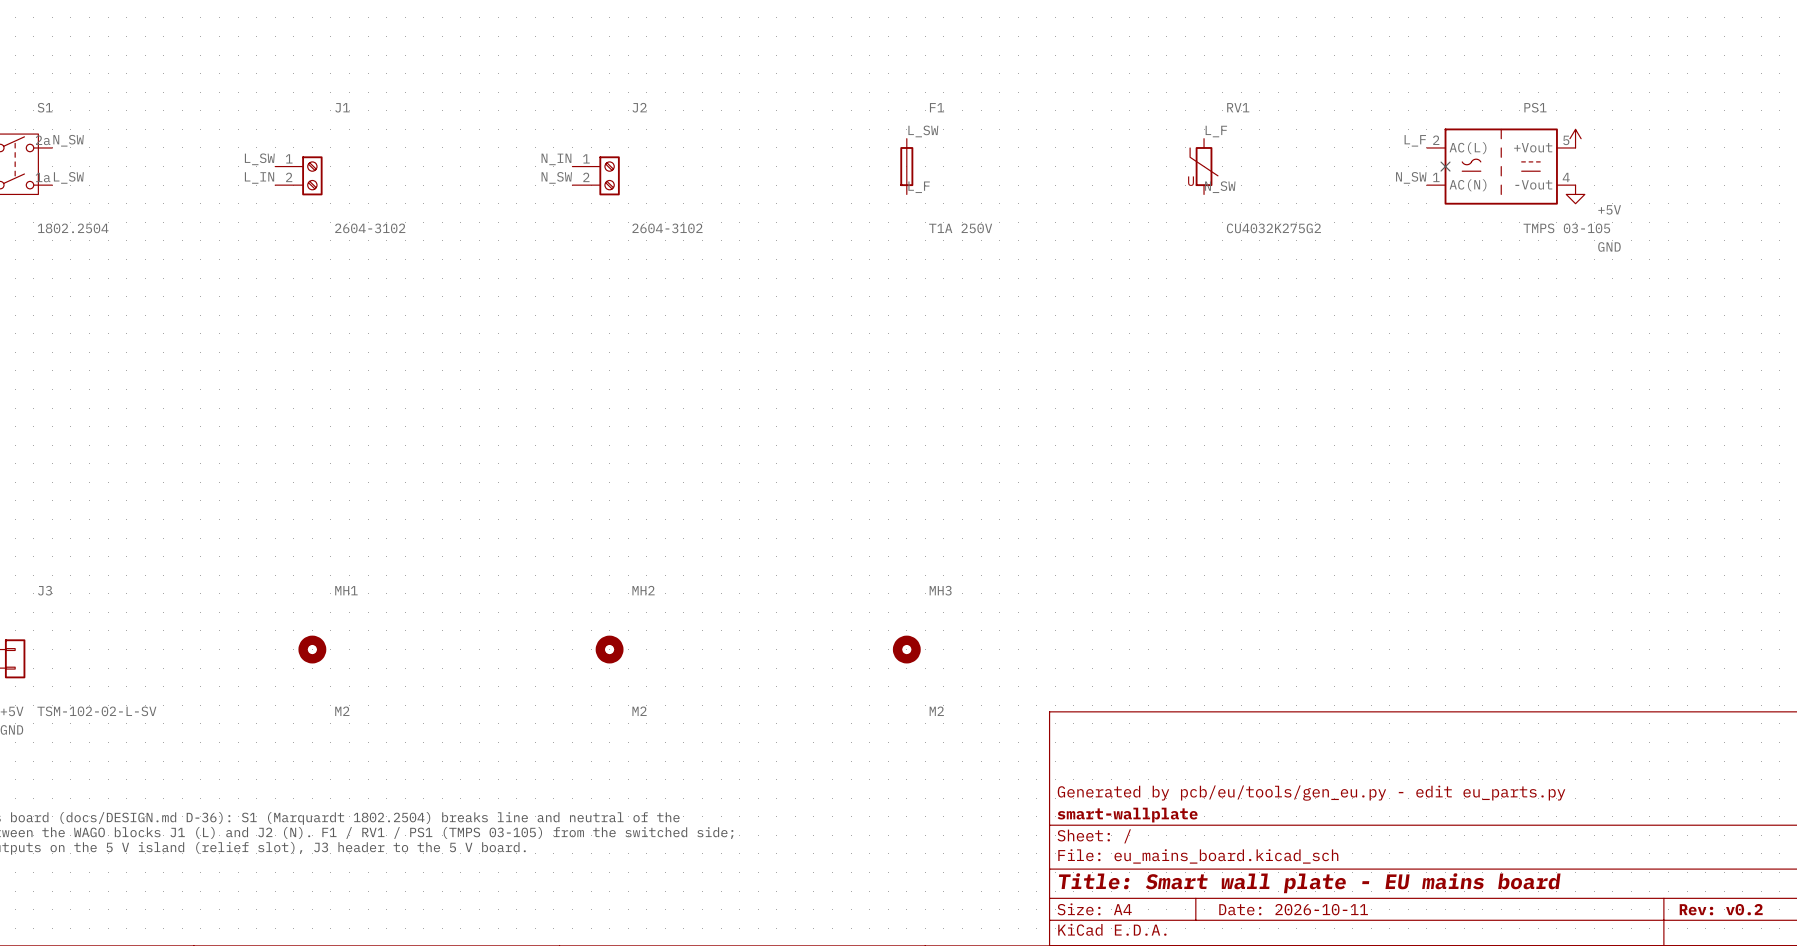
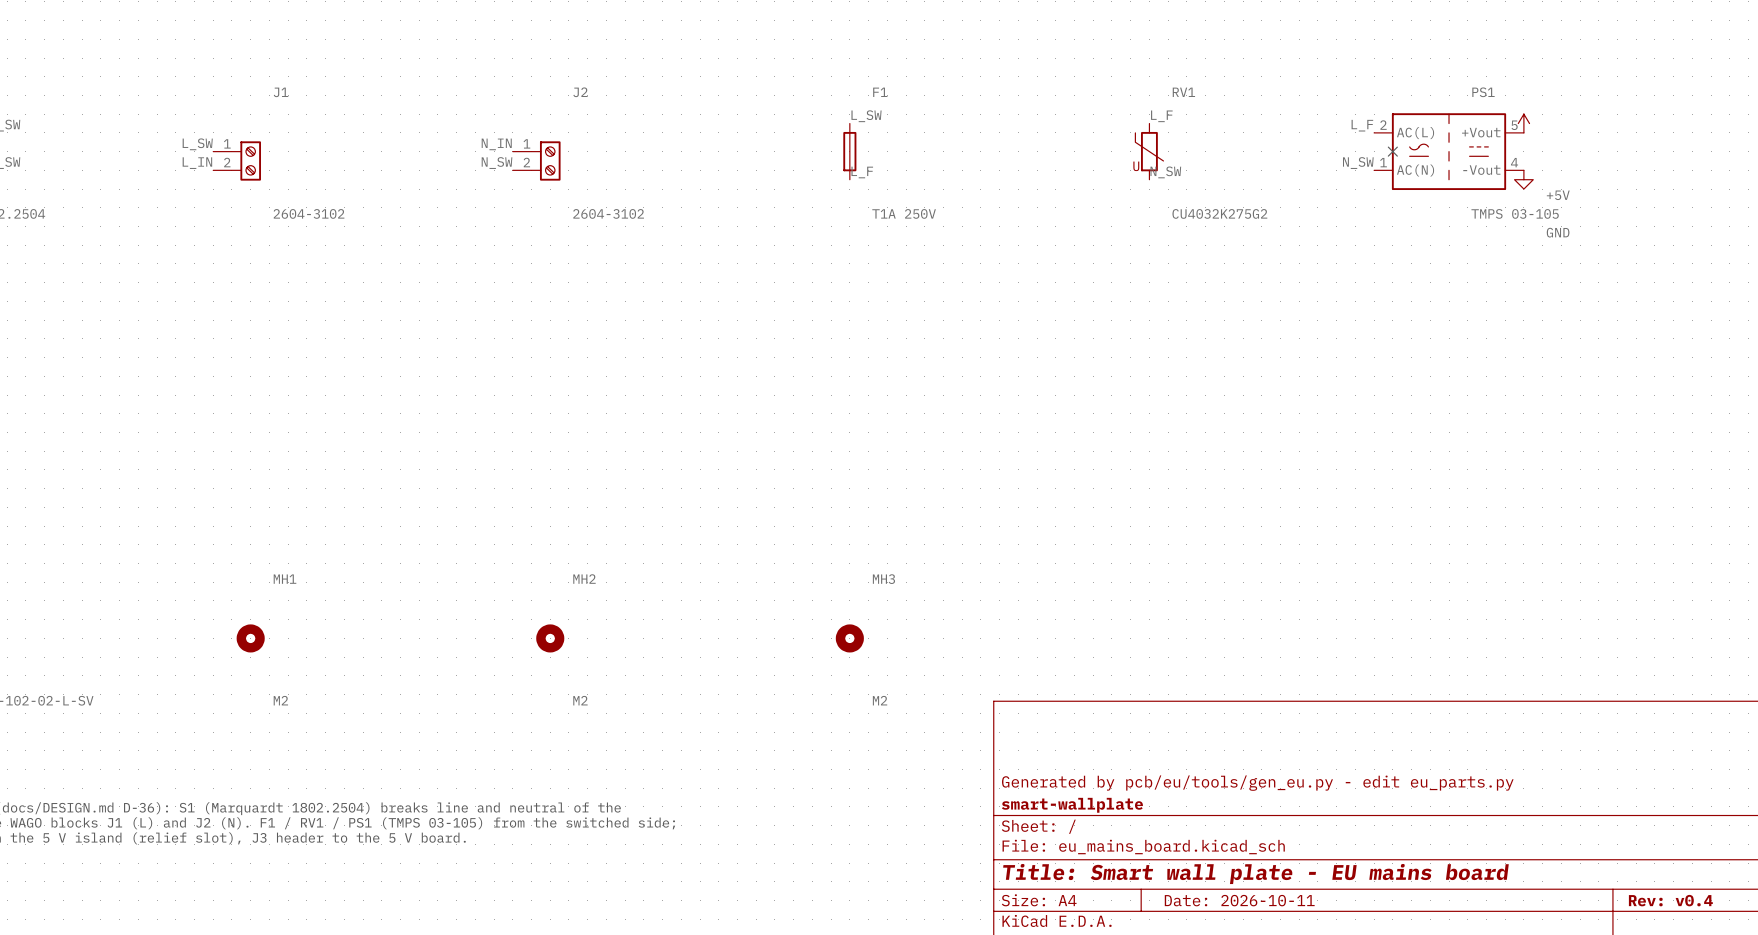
title block: Rev: v0.2 (1721, 909) -> Rev: v0.4 (1670, 900)

